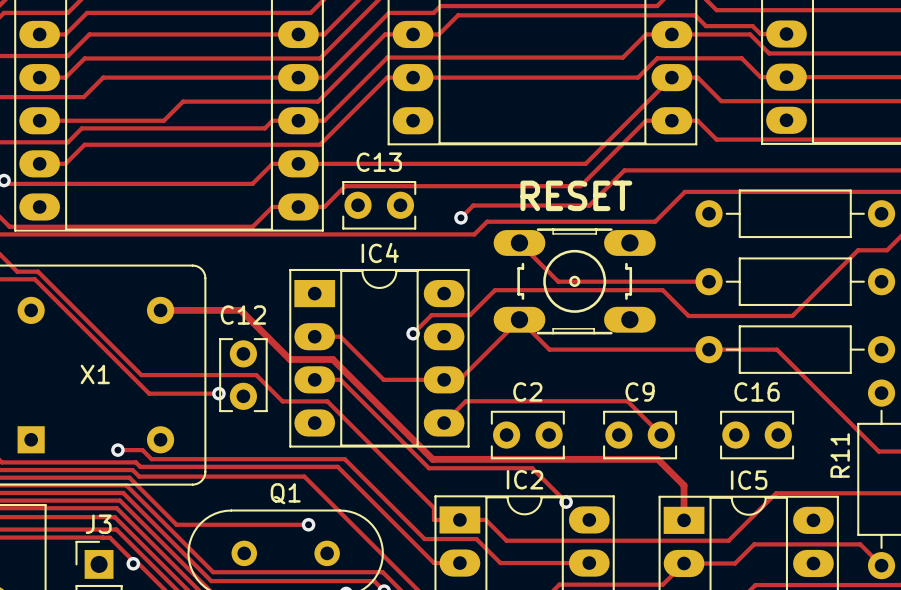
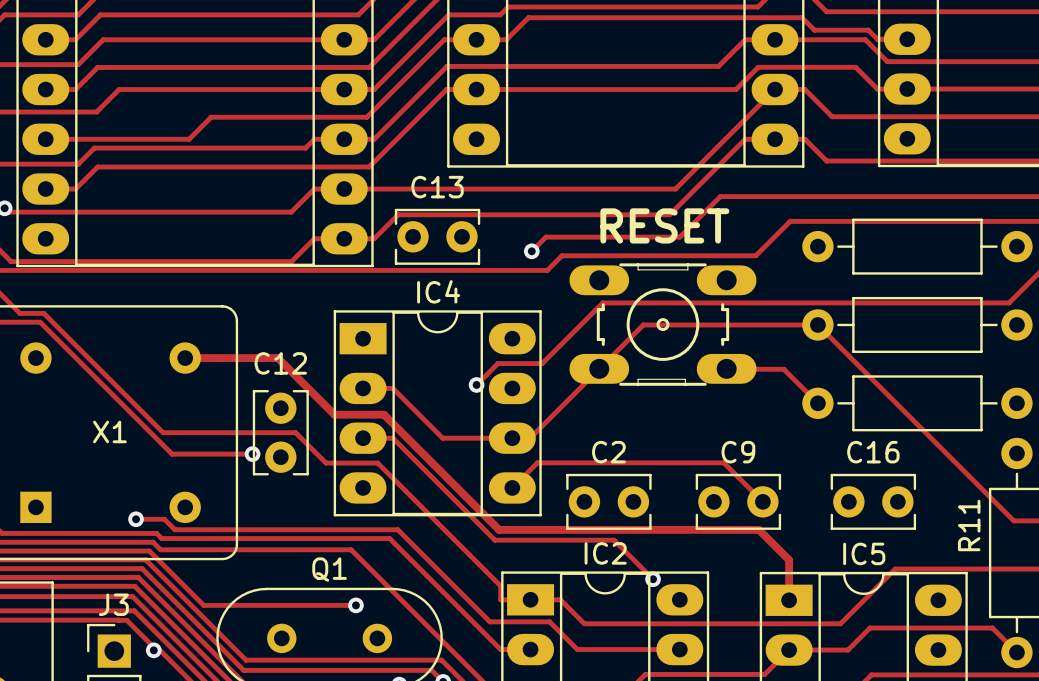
track: (519, 242) (558, 281) -> (599, 369) (644, 324)
track: (887, 250) (858, 250) (792, 316) (688, 316) (662, 290) (494, 290) -> (1023, 288) (1009, 302) (602, 302) (571, 334)
track: (519, 319) (549, 349) (776, 349) -> (817, 324) (896, 403)
track: none -> (726, 369) (783, 369) (817, 403)

